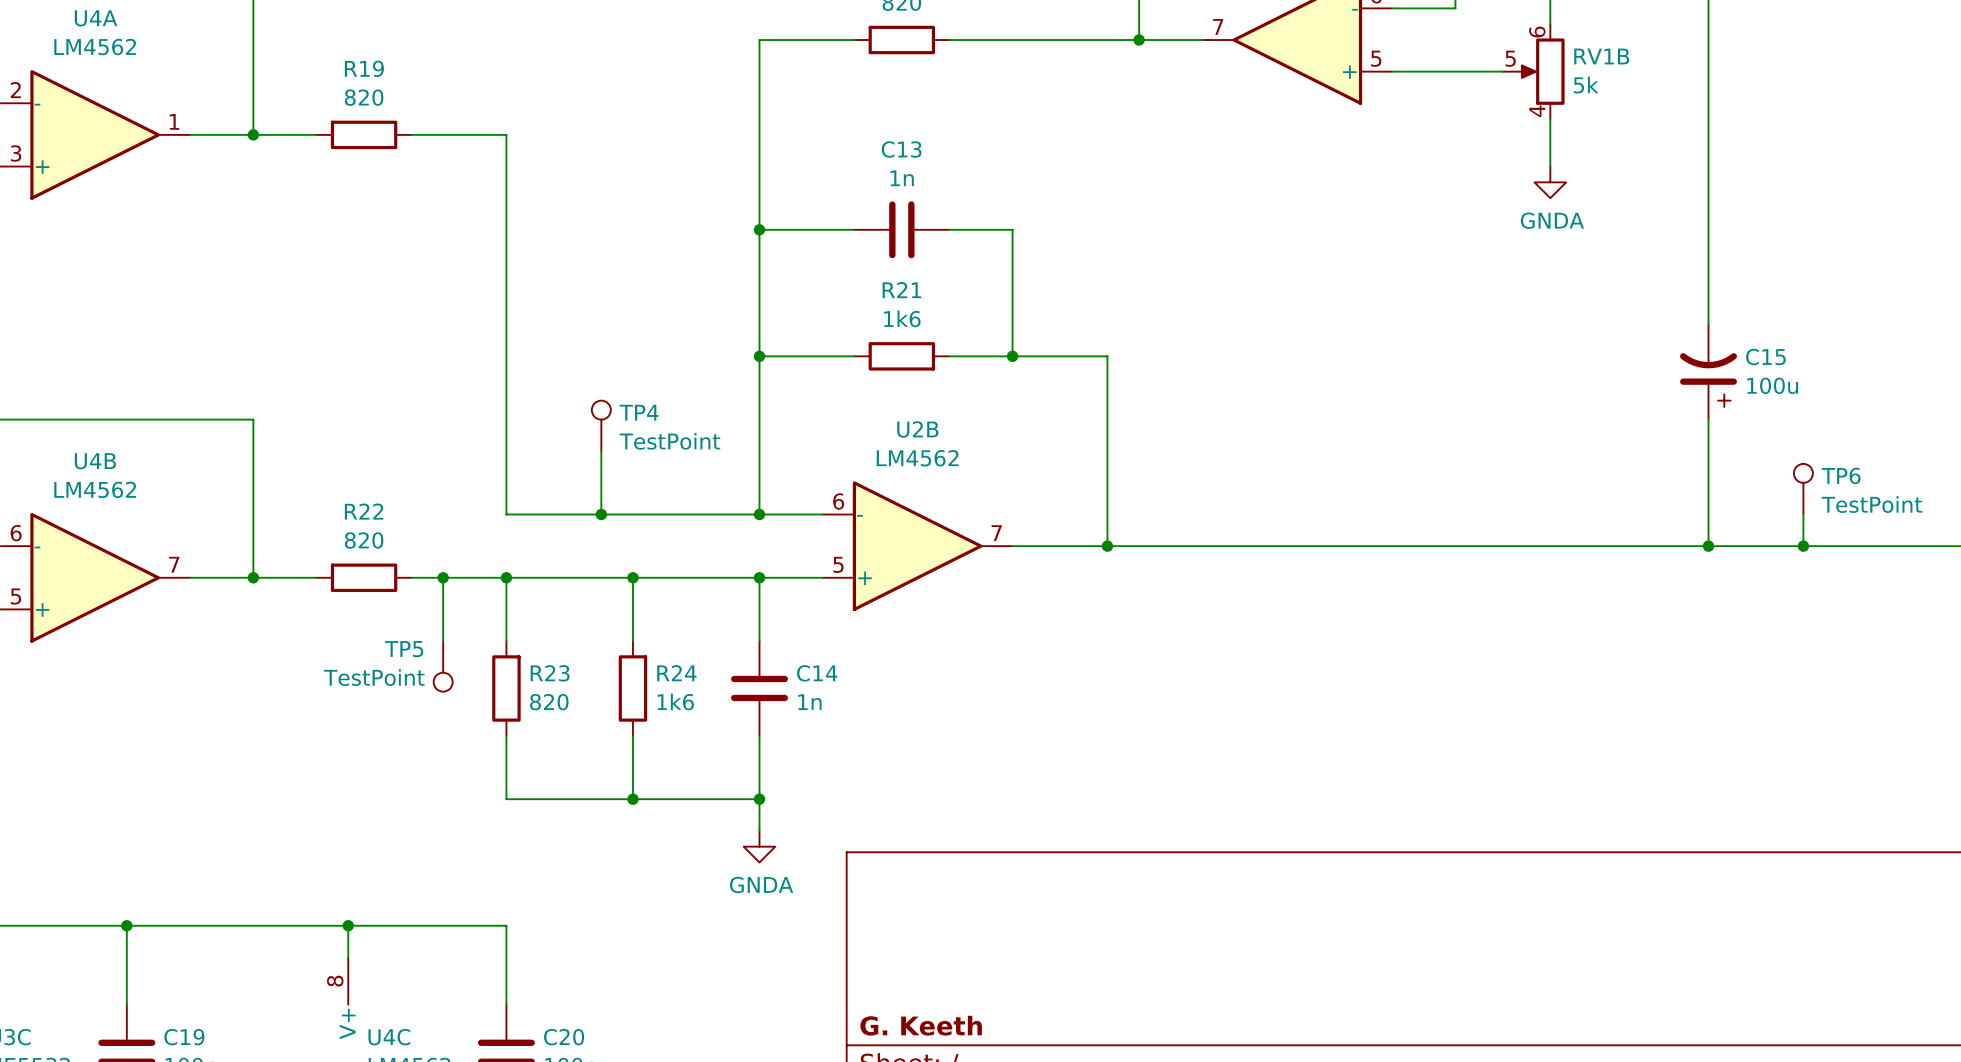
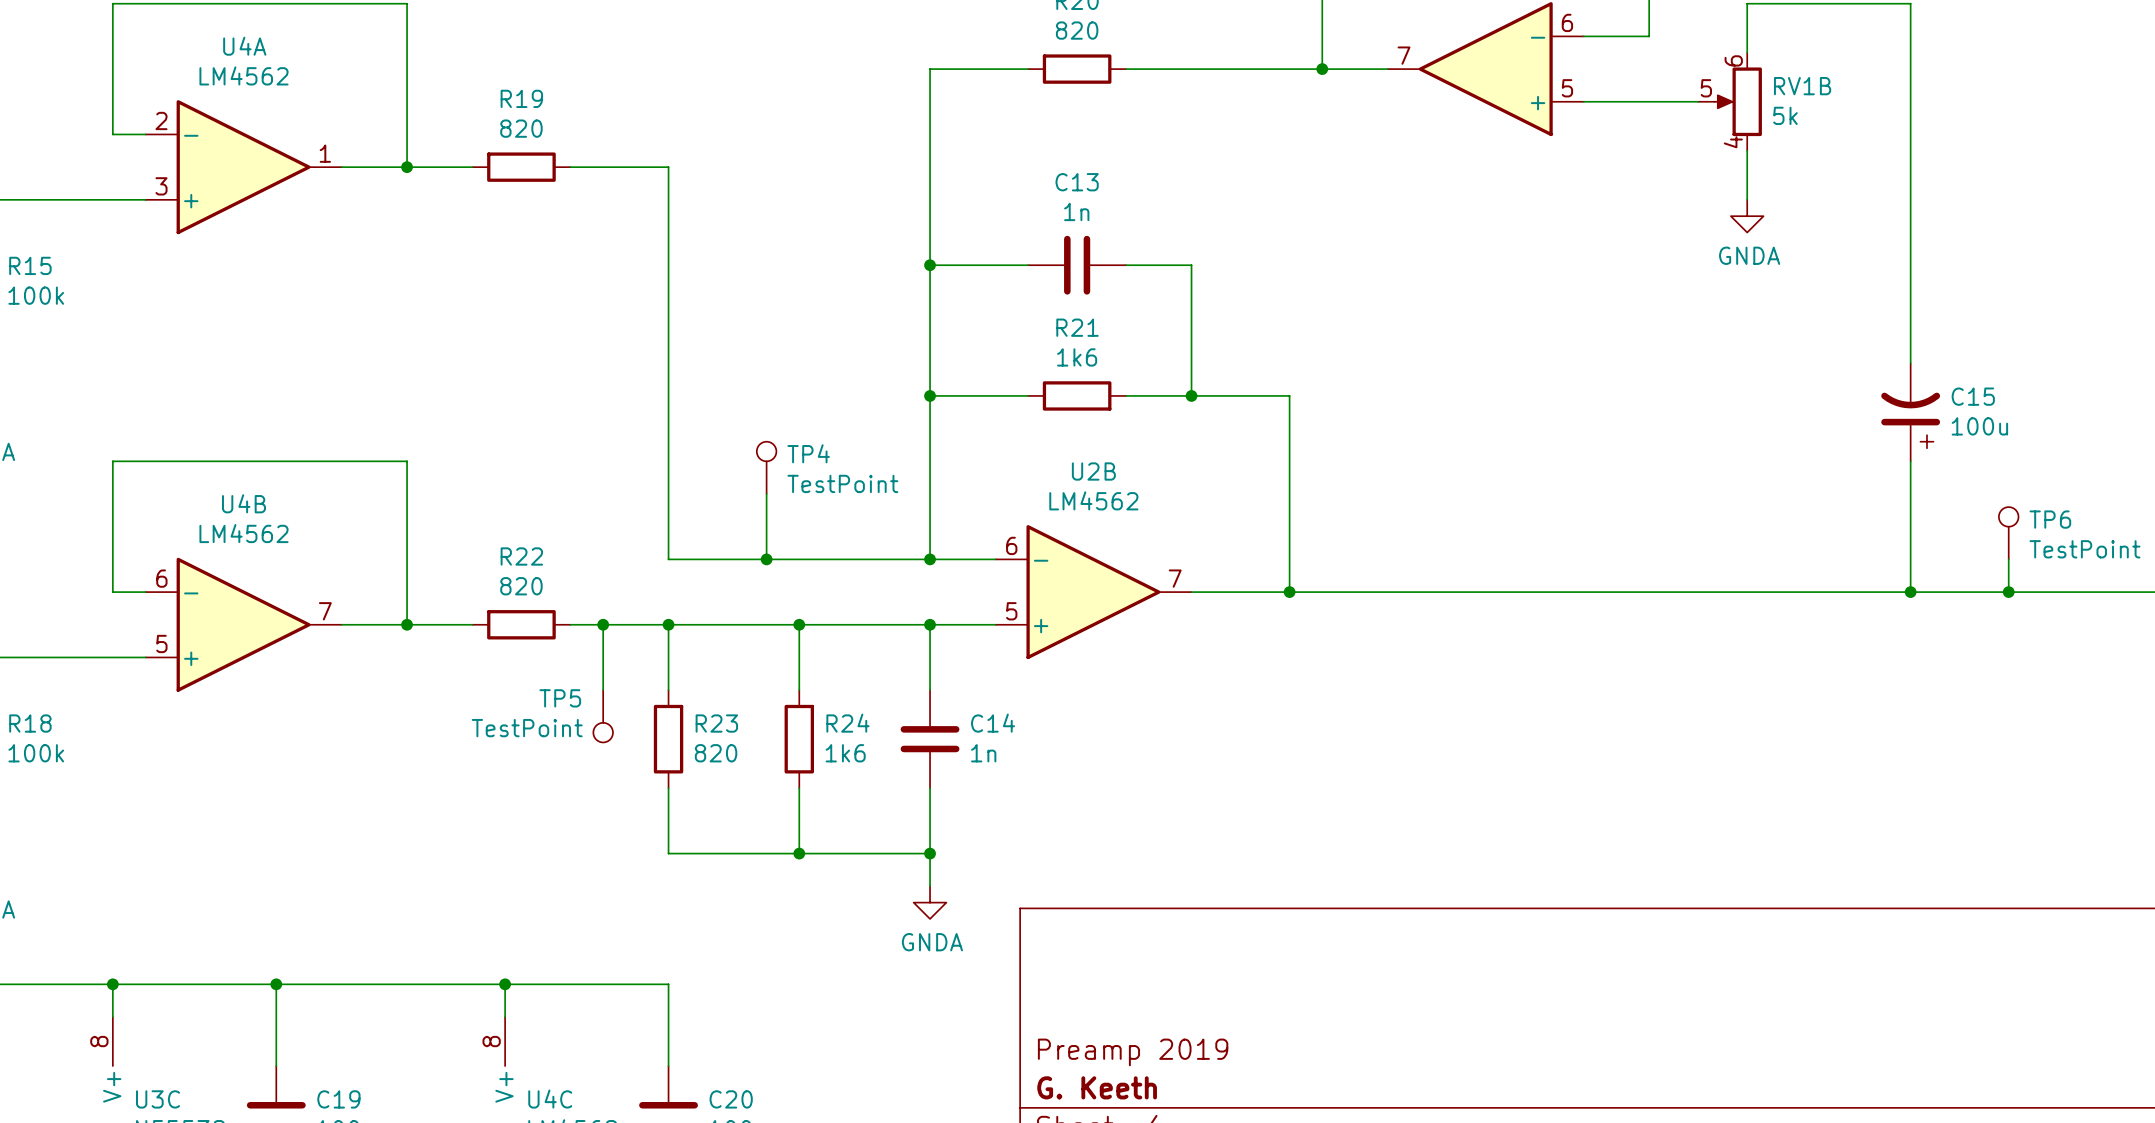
title block: none -> Preamp 2019 (1133, 1052)

